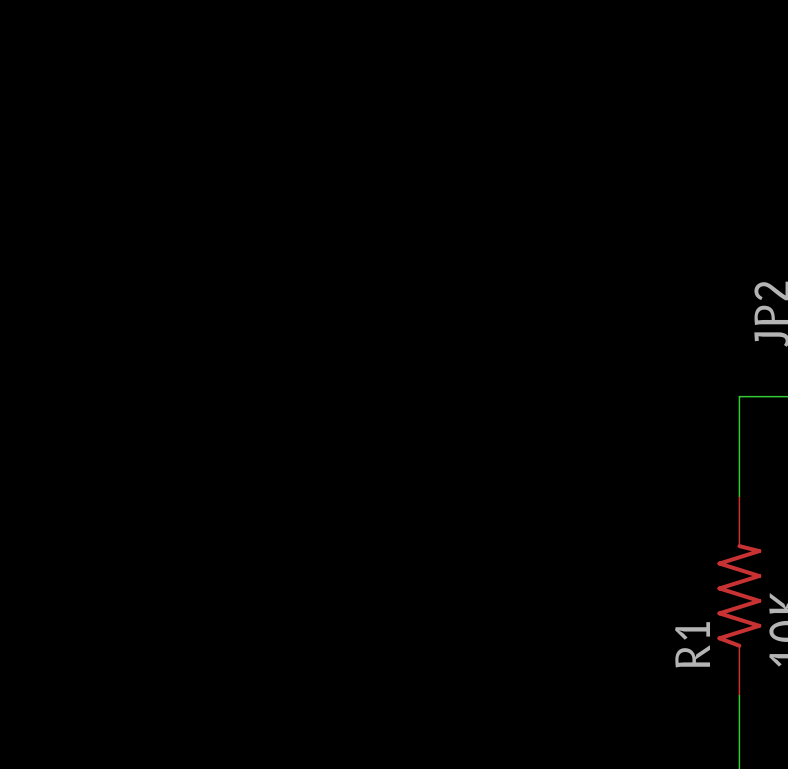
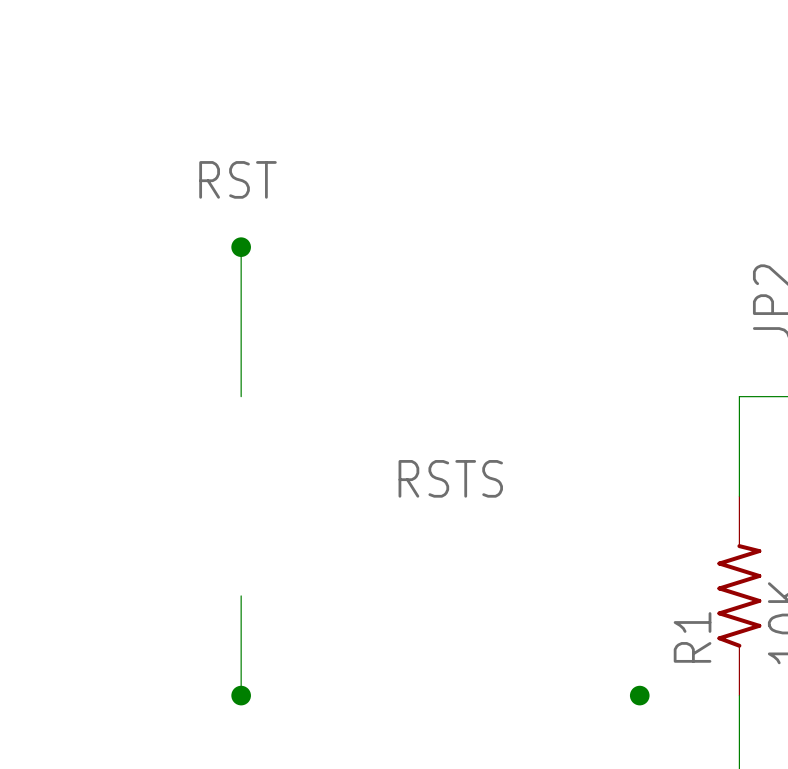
label: none -> RST (238, 179)
wire: none -> (241, 247) (241, 396)
junction: none -> (241, 247)
label: none -> RSTS (450, 478)
wire: none -> (241, 595) (241, 695)
junction: none -> (241, 695)
junction: none -> (639, 695)

